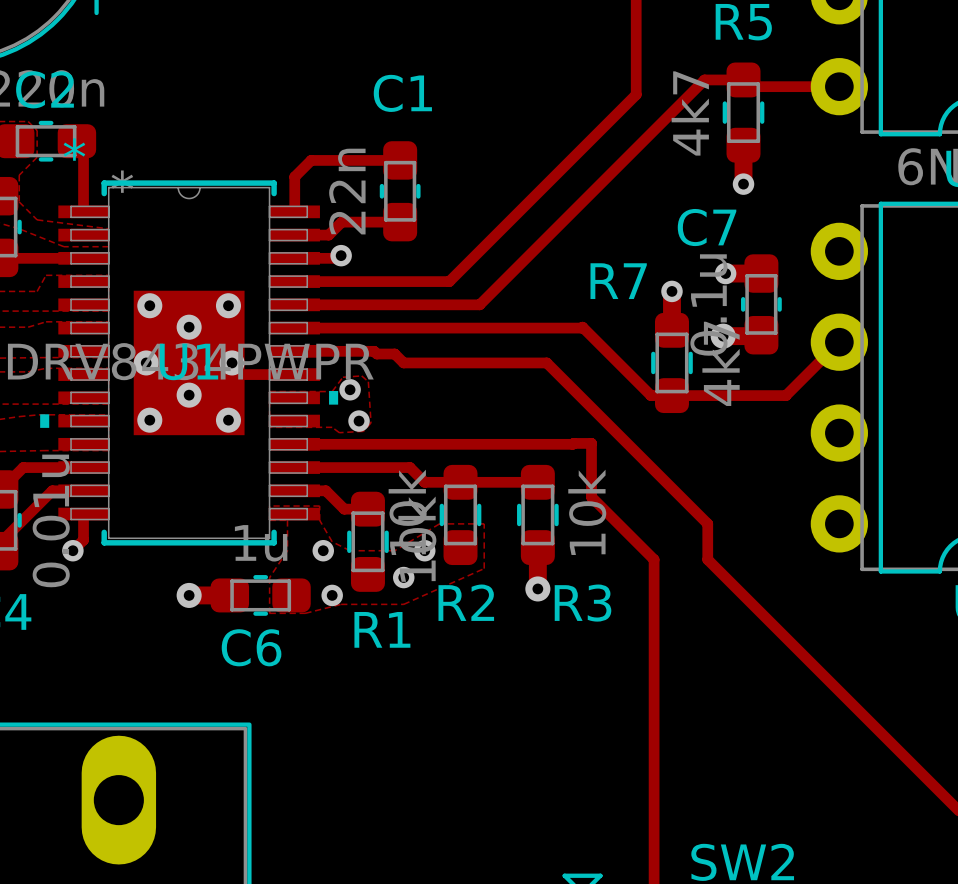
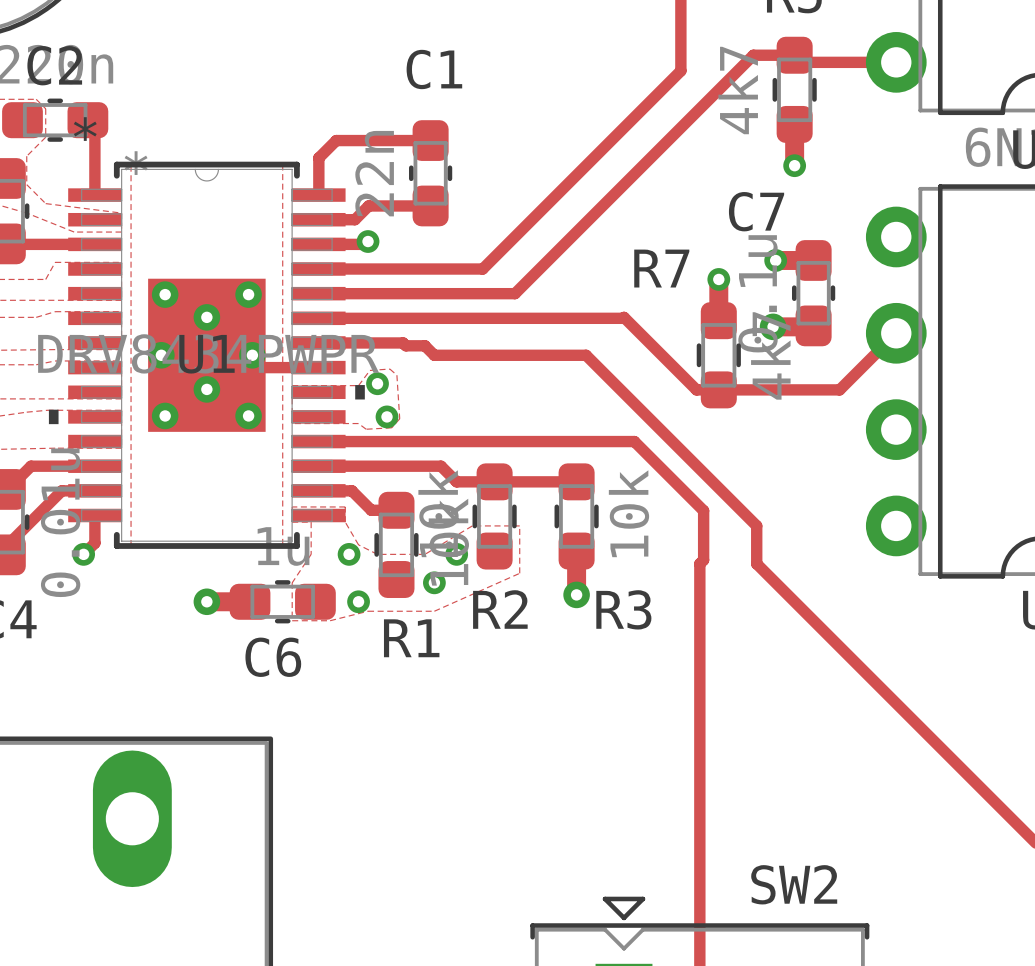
top zone outline: none -> (131, 165) (131, 544) (282, 544) (282, 165) (131, 165)
top track: (572, 444) (591, 443) (591, 497) (654, 559) -> (613, 441) (634, 441) (703, 510) (703, 560) (699, 563)

